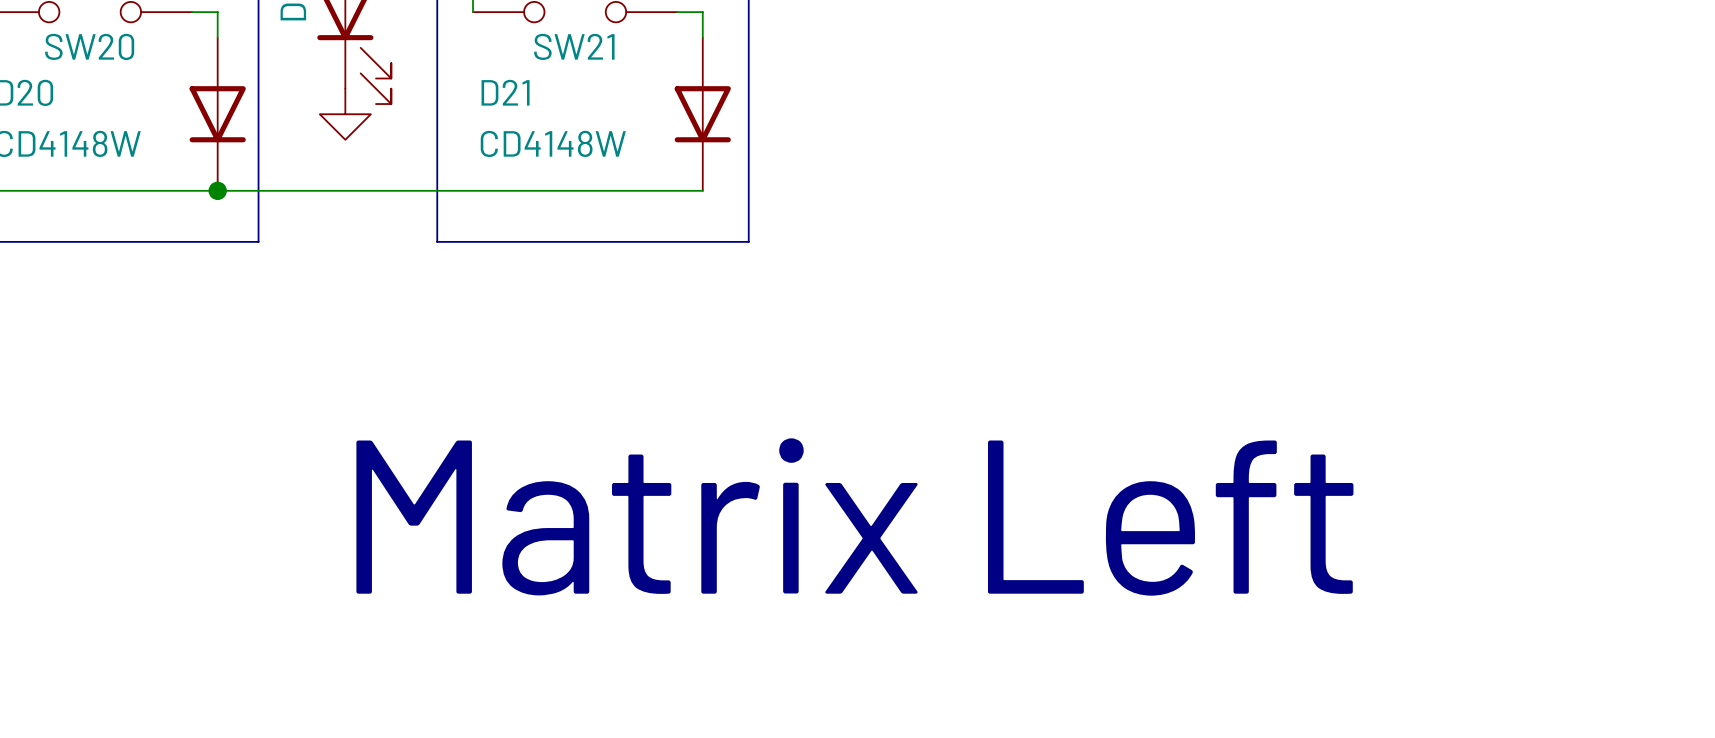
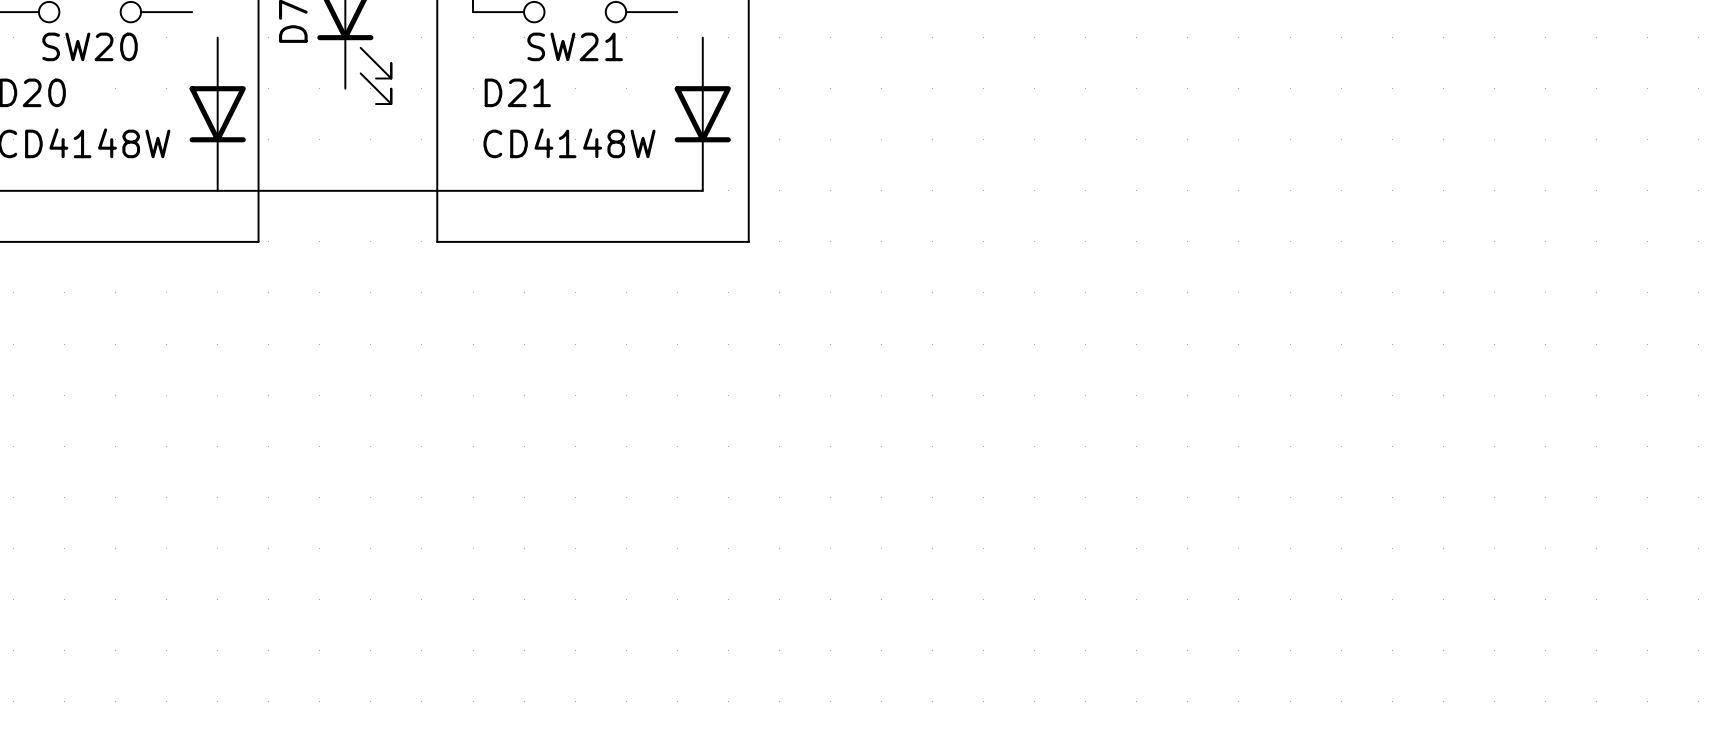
wire: (192, 12) (217, 12) (217, 37) -> none
wire: (677, 12) (702, 12) (702, 37) -> none
power symbol: (345, 114) -> none
junction: (217, 190) -> none
text: Matrix Left (854, 516) -> none

